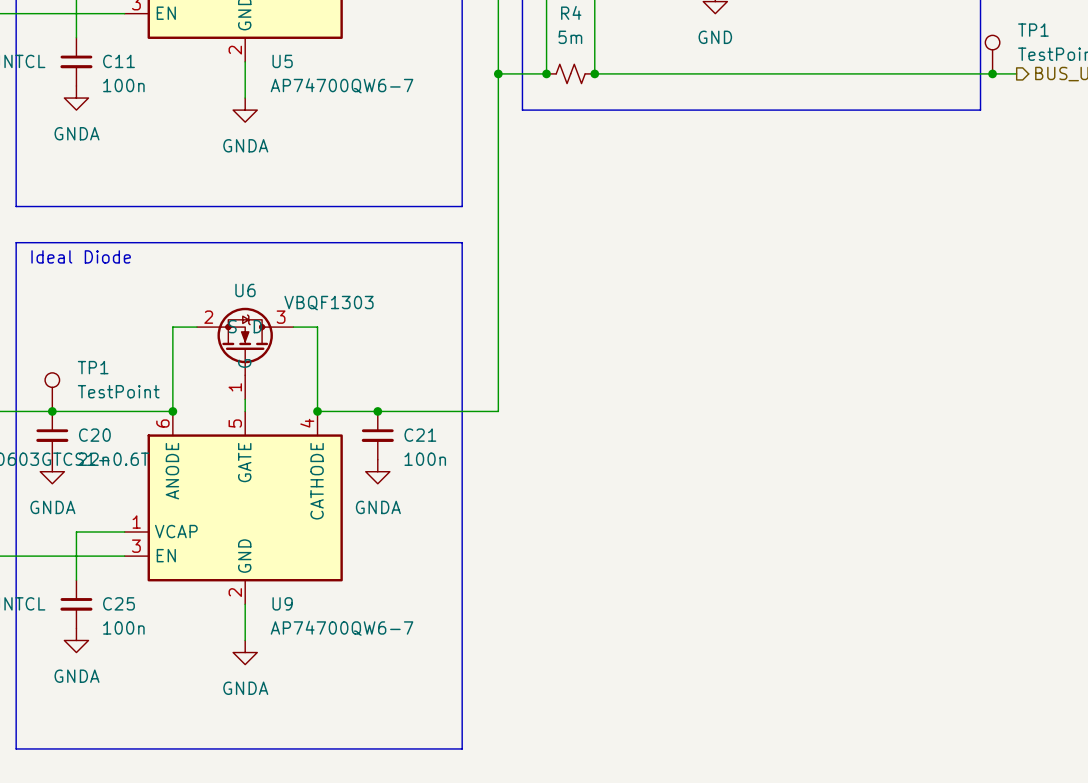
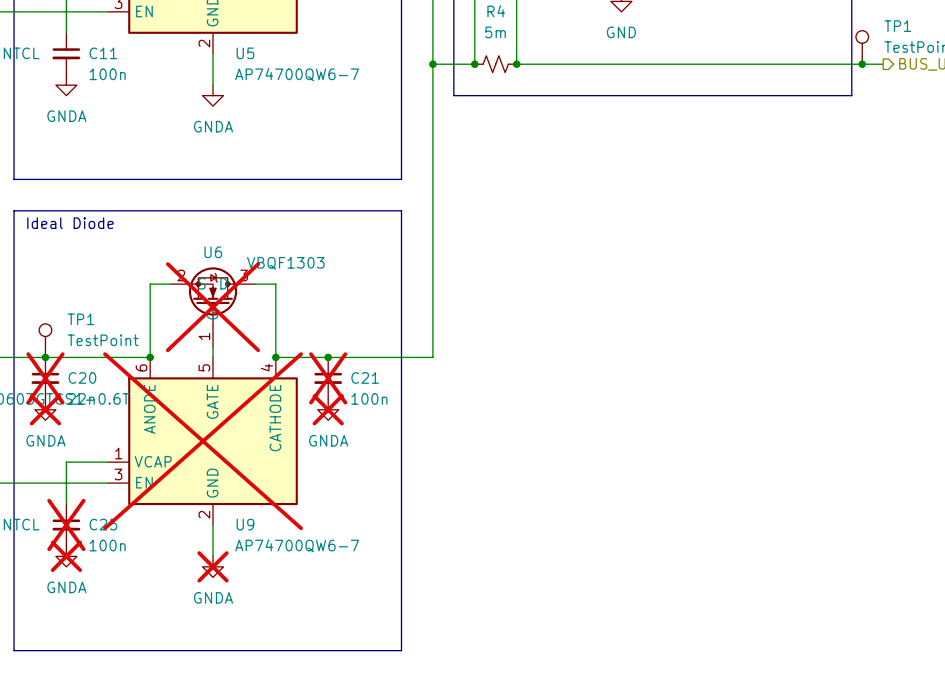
U6 do-not-place cross: none -> (213, 307)
C20 do-not-place cross: none -> (45, 378)
C21 do-not-place cross: none -> (328, 378)
power symbol do-not-place cross: none -> (45, 409)
power symbol do-not-place cross: none -> (328, 409)
U9 do-not-place cross: none -> (203, 441)
C25 do-not-place cross: none -> (66, 524)
power symbol do-not-place cross: none -> (66, 556)
power symbol do-not-place cross: none -> (213, 566)

